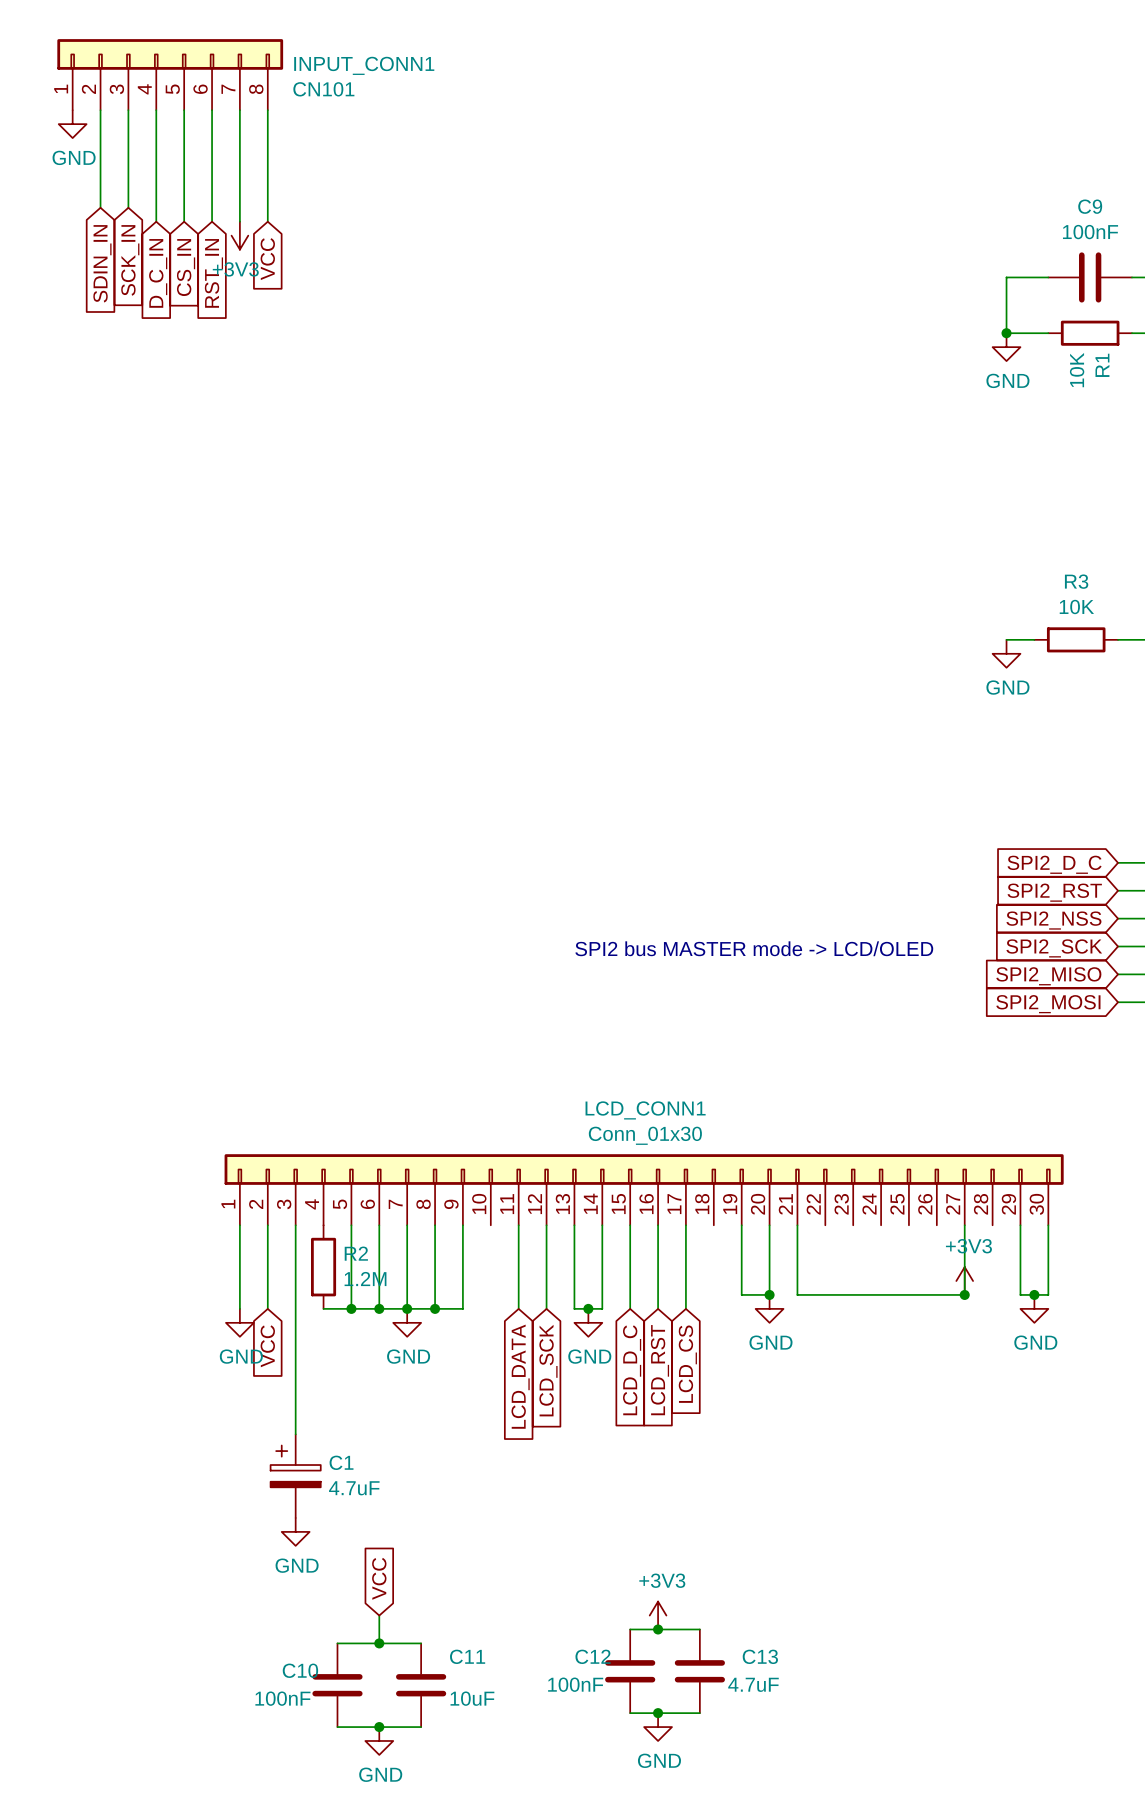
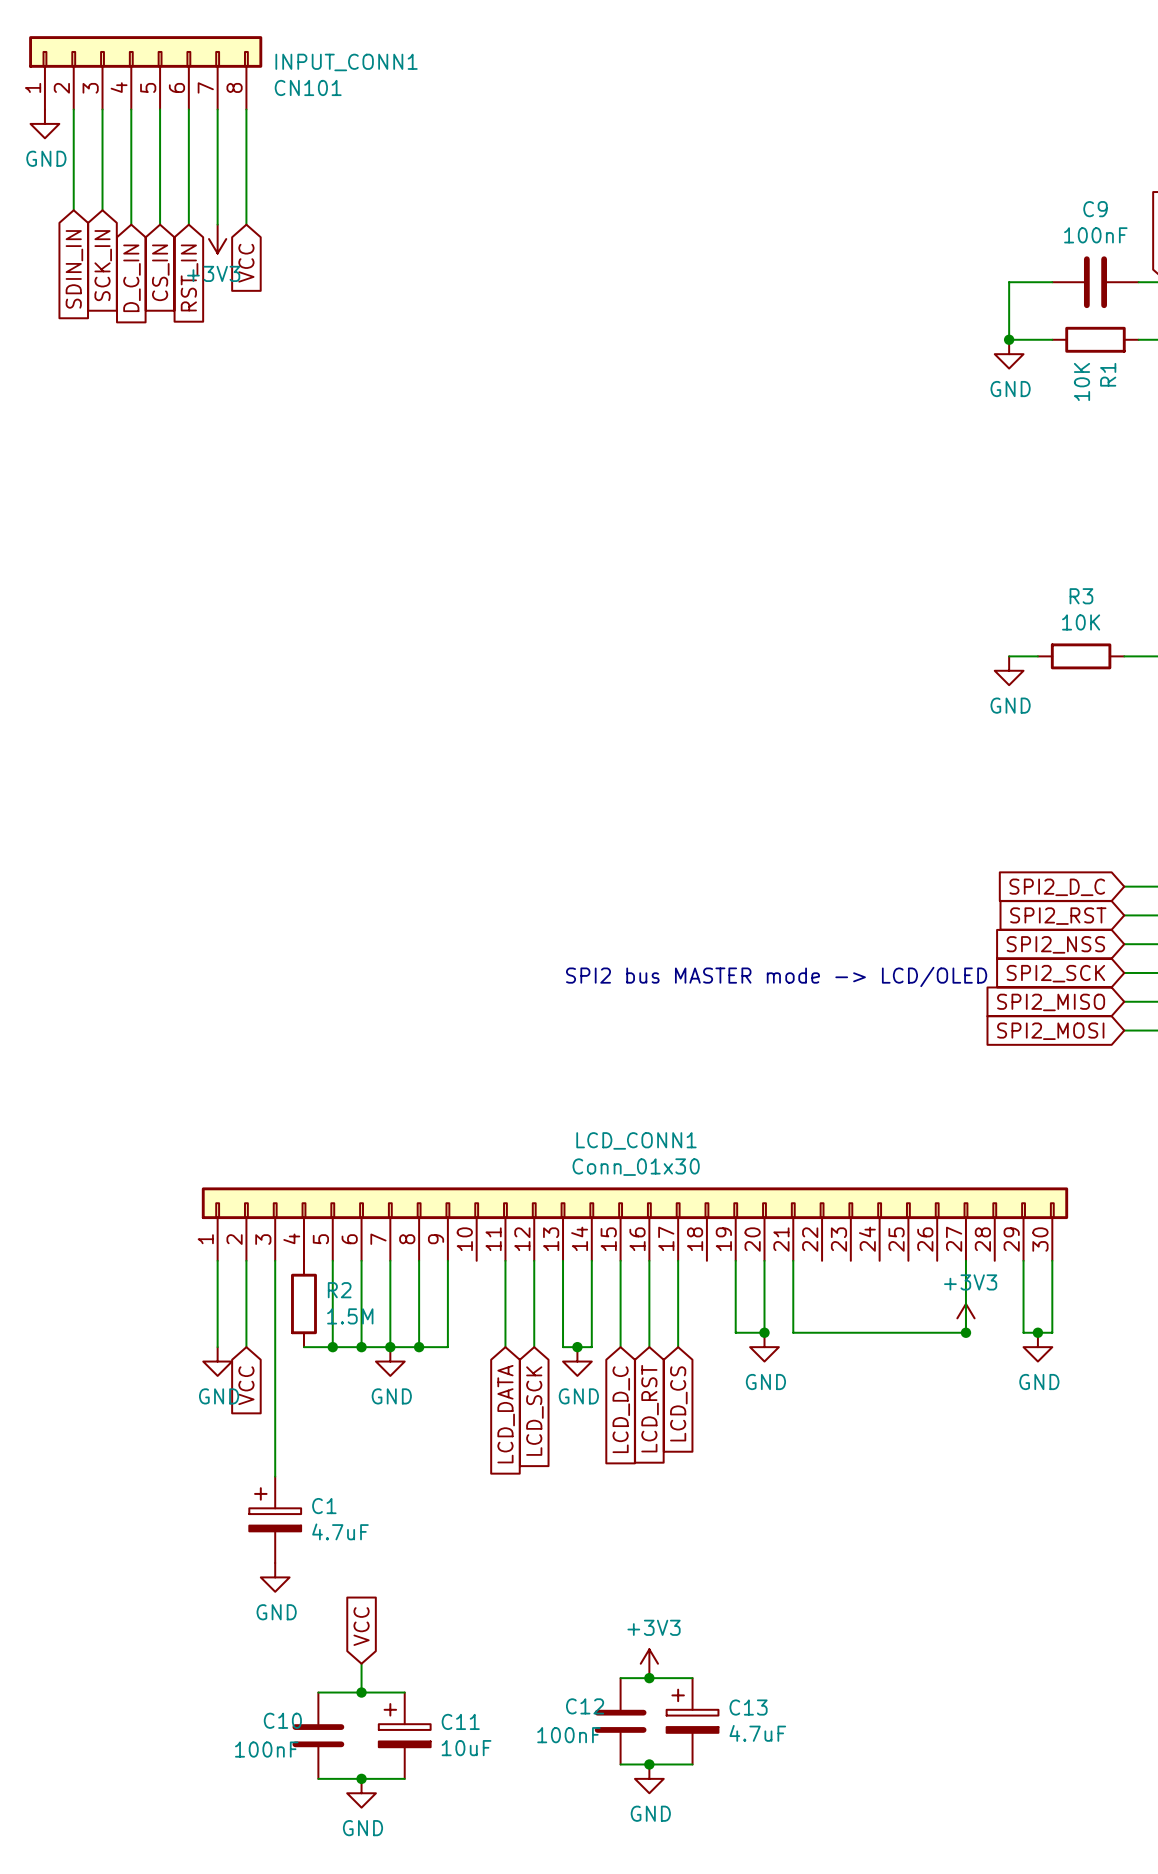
R2 value: 1.2M (365, 1279) -> 1.5M (350, 1316)
C13 symbol: [674, 1629, 725, 1714] -> [666, 1678, 719, 1765]
C11 symbol: [396, 1643, 447, 1728] -> [378, 1692, 431, 1779]

